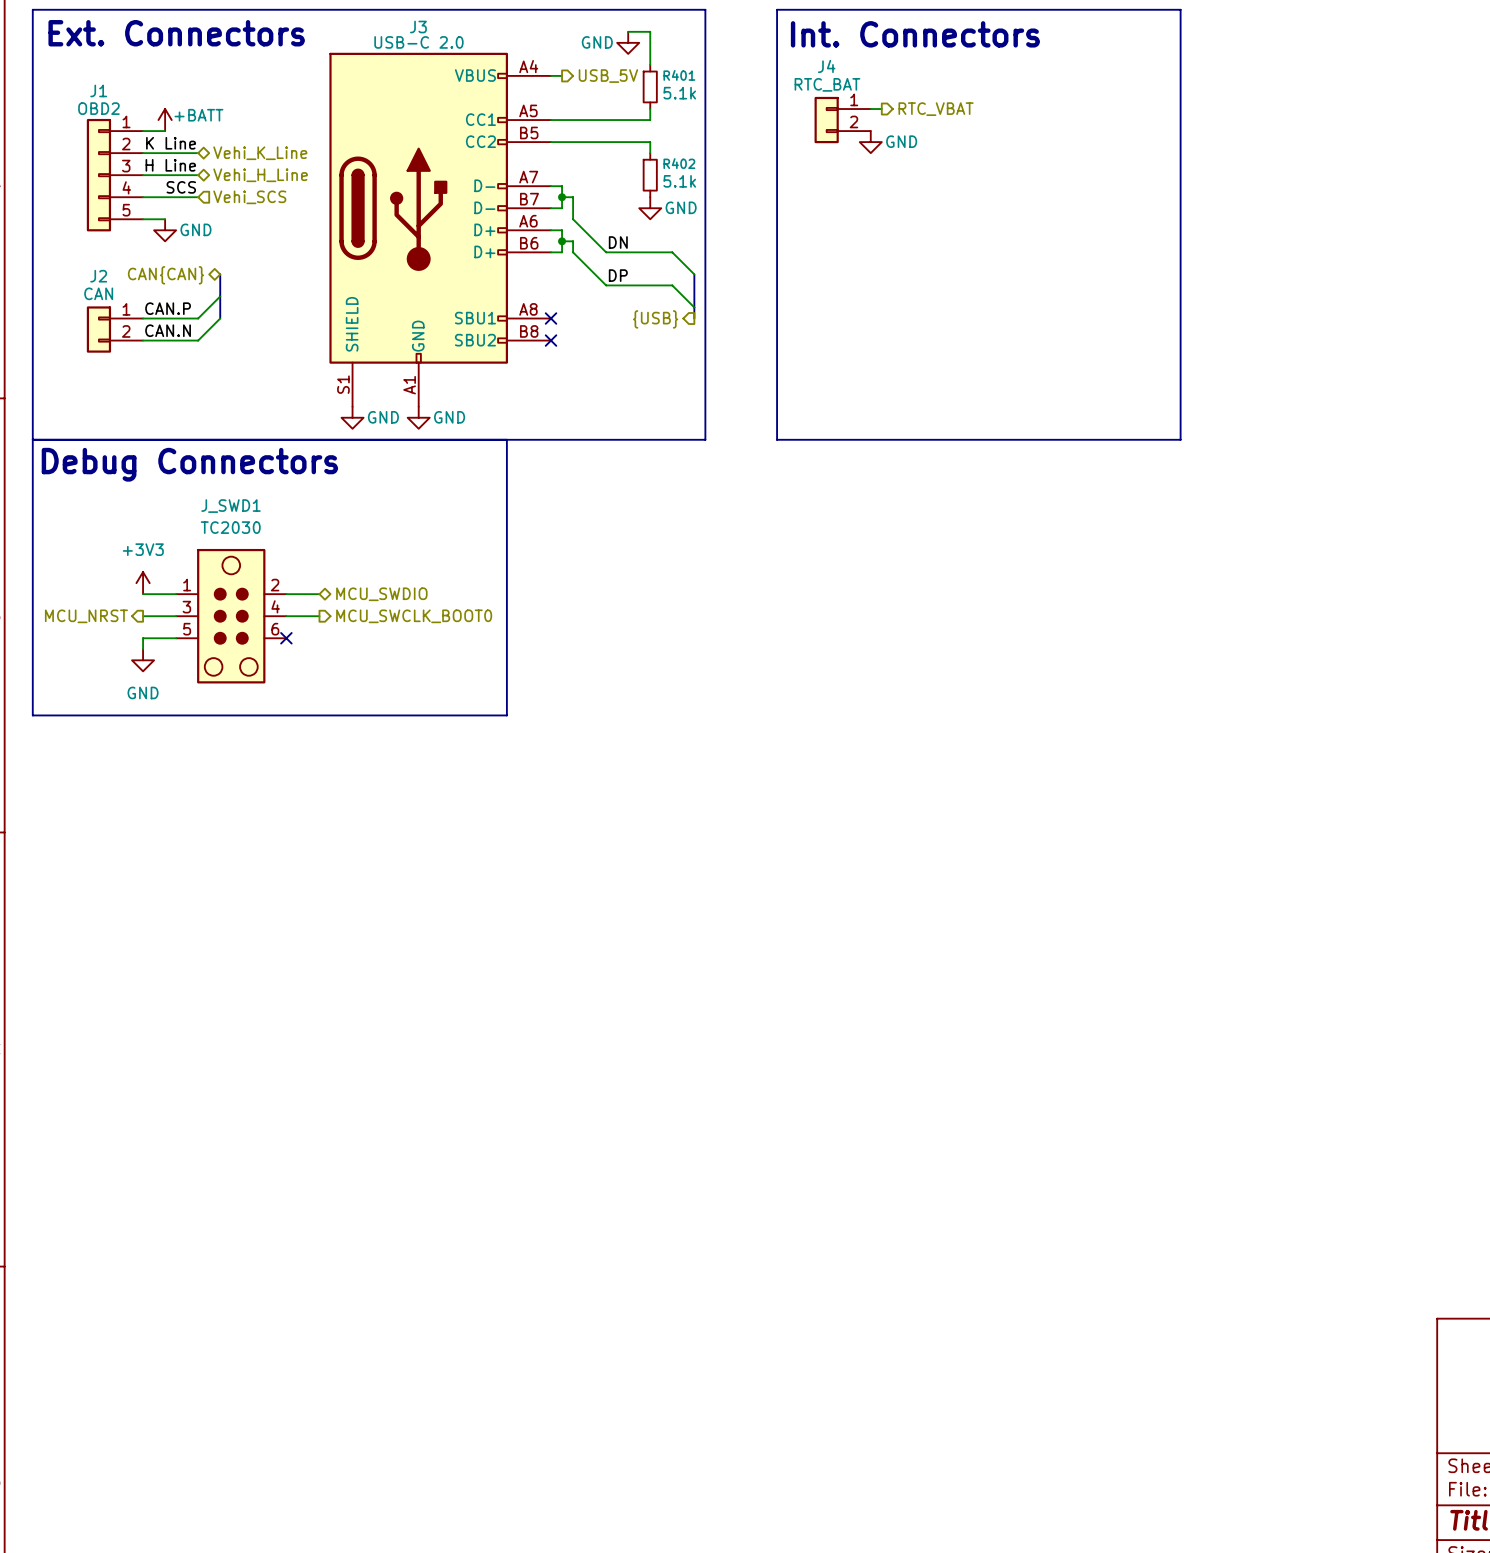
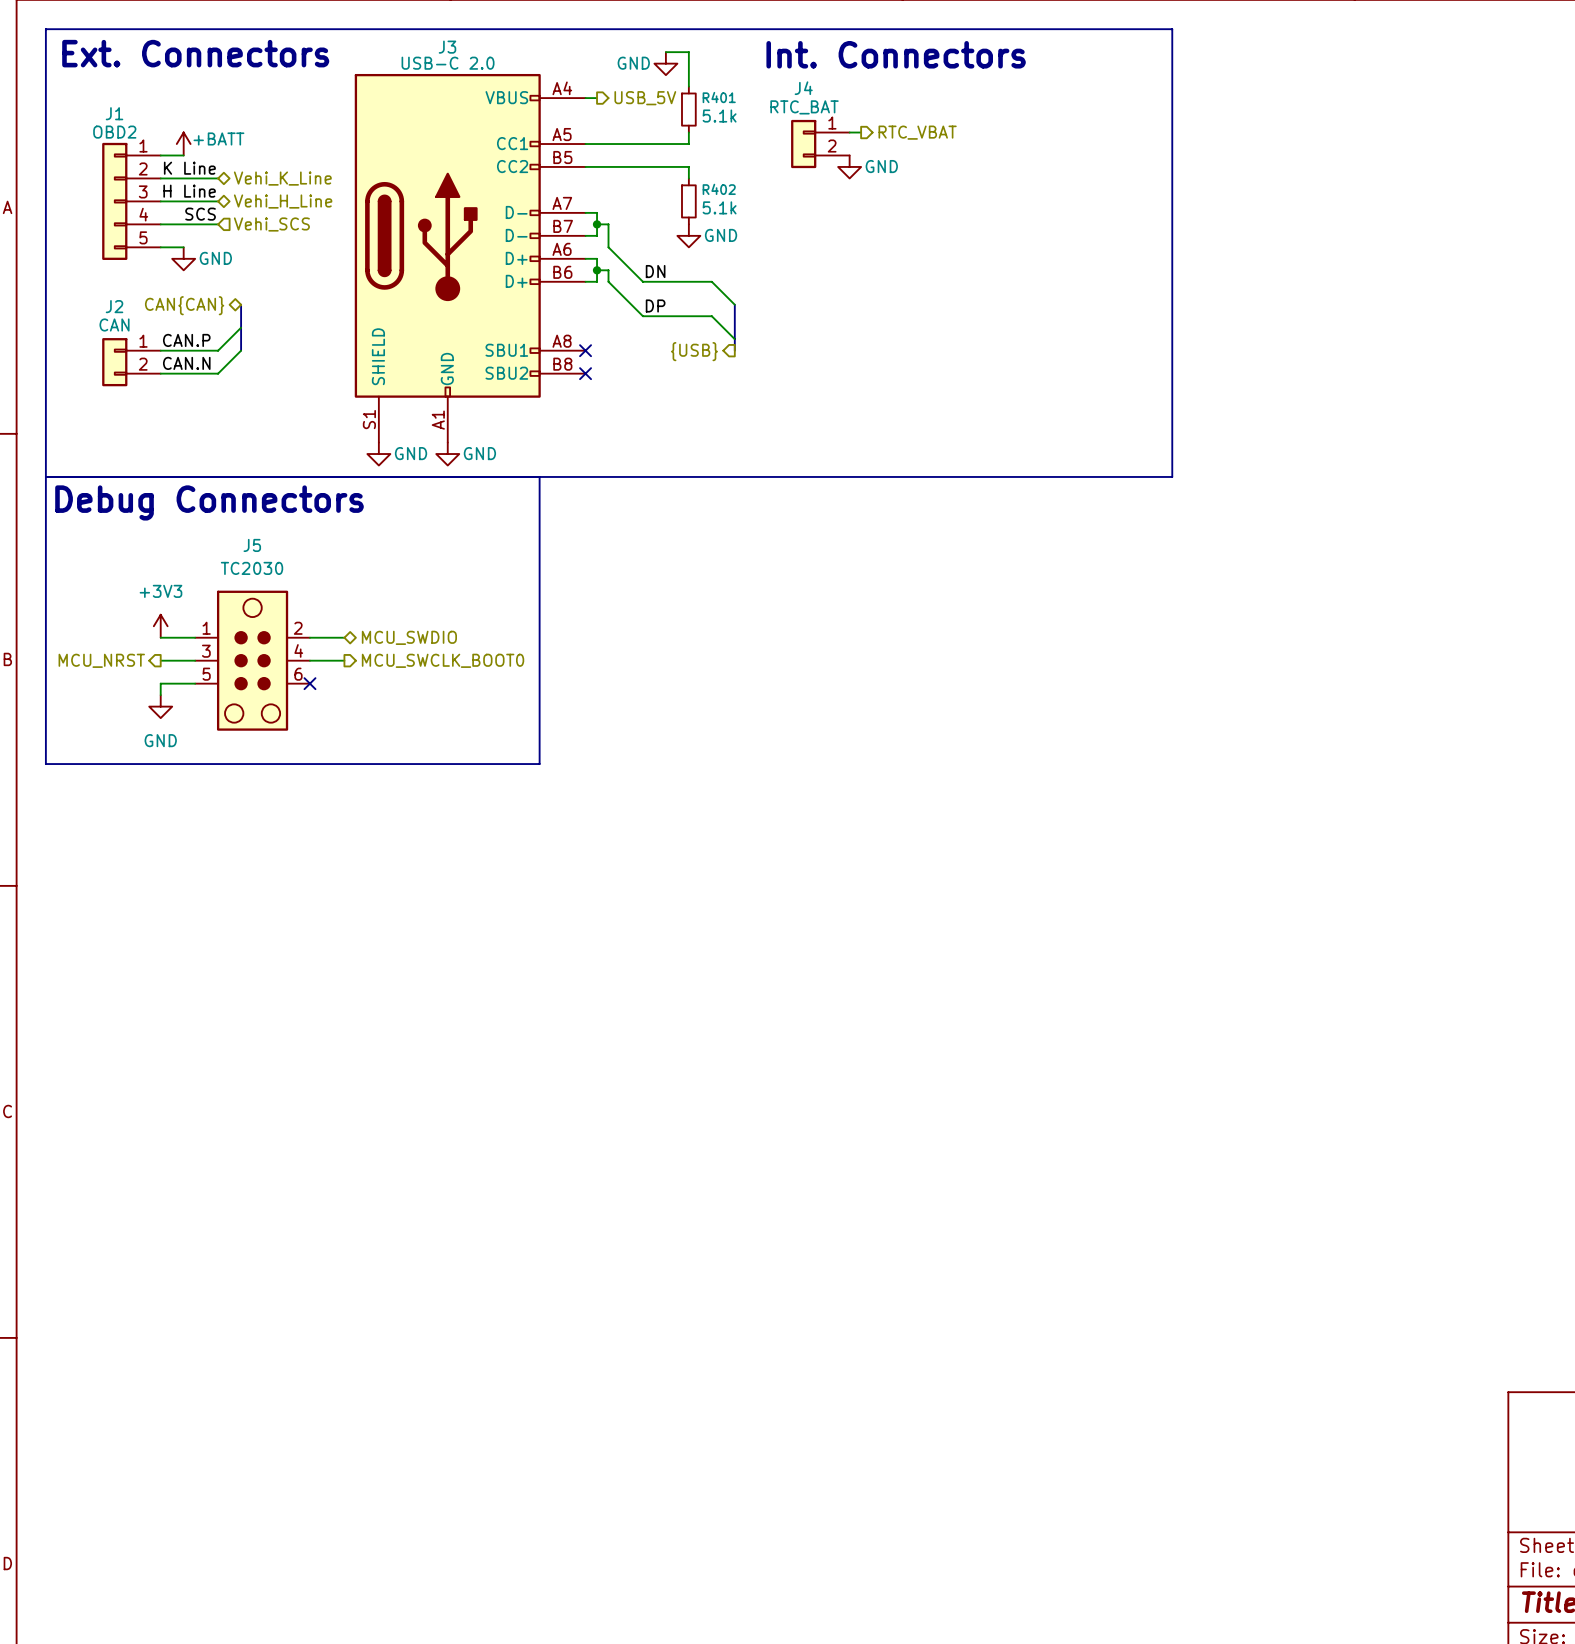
line: (705, 9) (705, 439) -> (746, 29) (820, 29)
line: (777, 9) (777, 439) -> (746, 476) (820, 476)
line: (1114, 9) (1180, 9) (1180, 439) (1114, 439) -> (1172, 29) (1172, 476)
text position: Int. Connectors (915, 34) -> Int. Connectors (896, 54)
wire: (870, 109) (881, 109) -> (849, 132) (861, 132)
hierarchical label position: RTC_VBAT (936, 109) -> RTC_VBAT (917, 132)
J4 position: (842, 120) -> (820, 144)
power symbol position: GND (870, 142) -> GND (849, 166)
J_SWD1 name: J_SWD1 (230, 506) -> J5 (252, 545)

